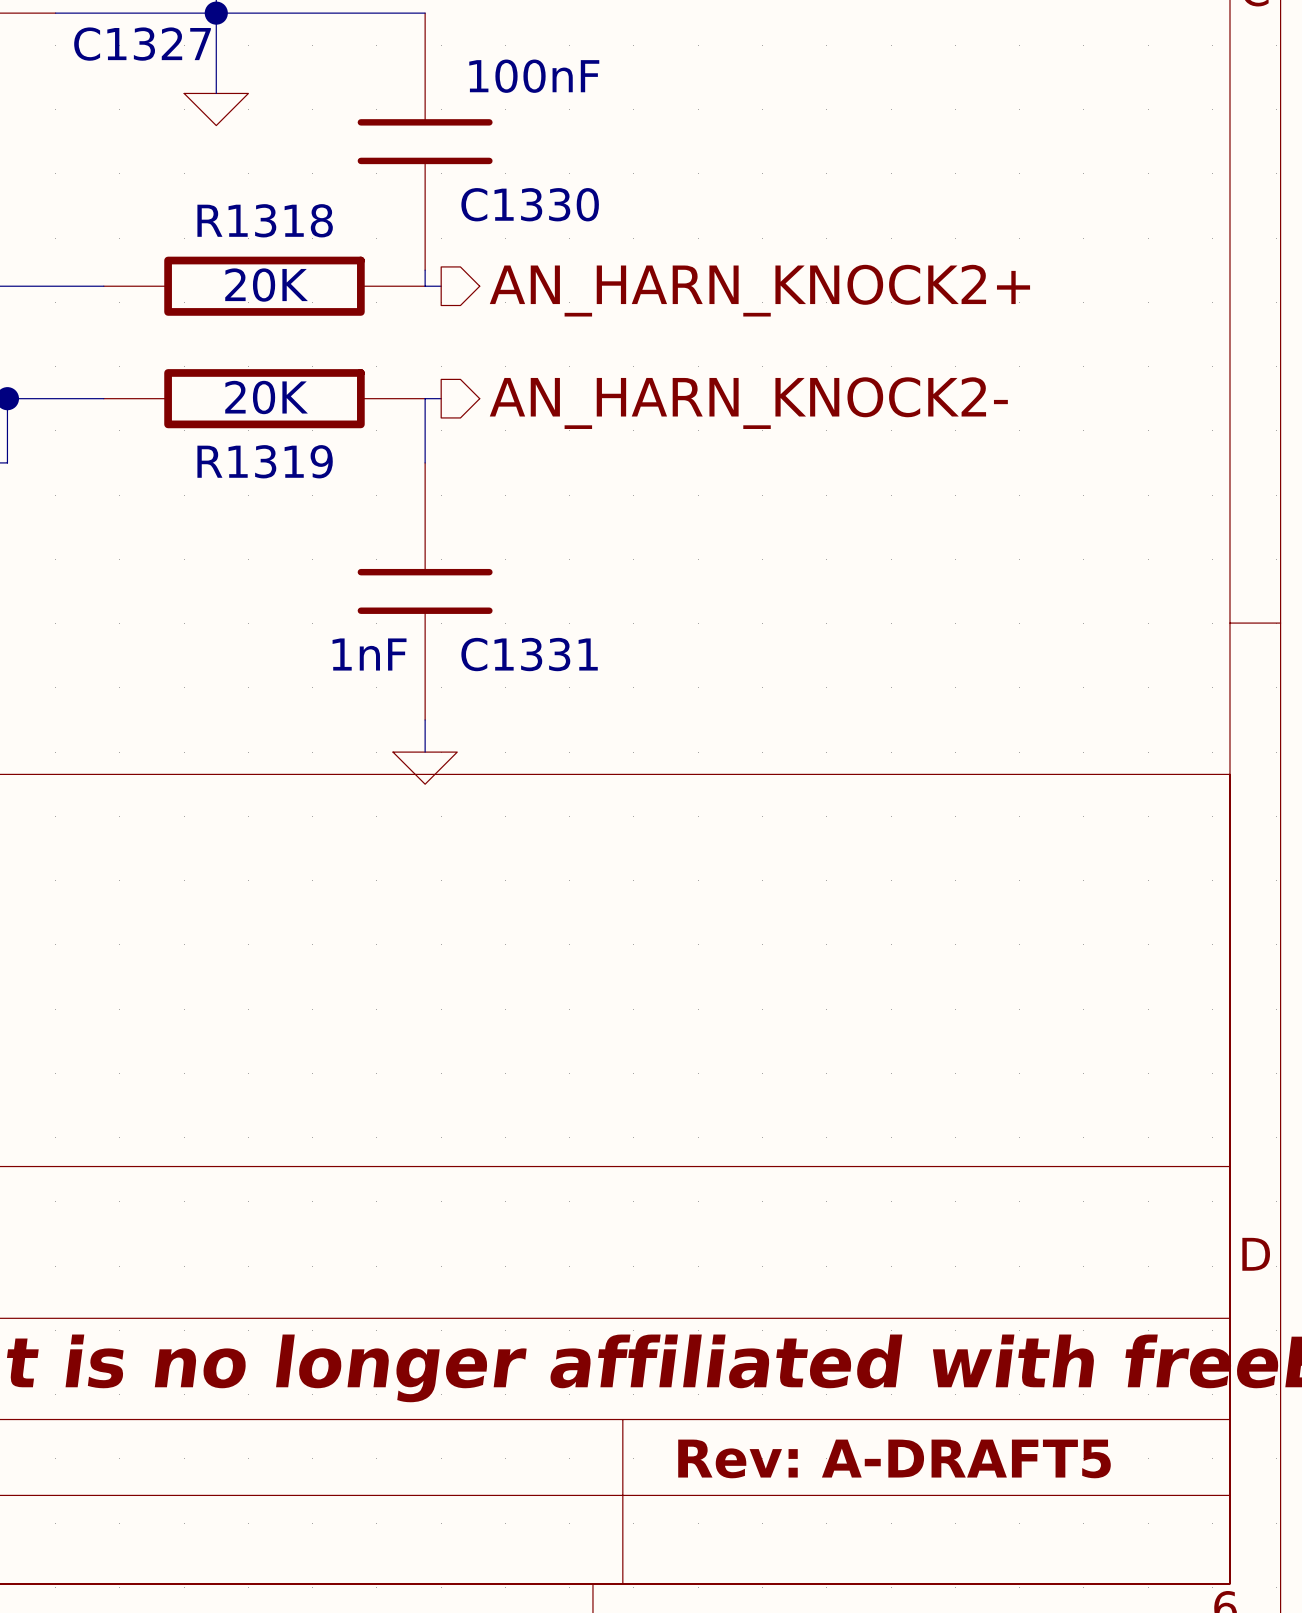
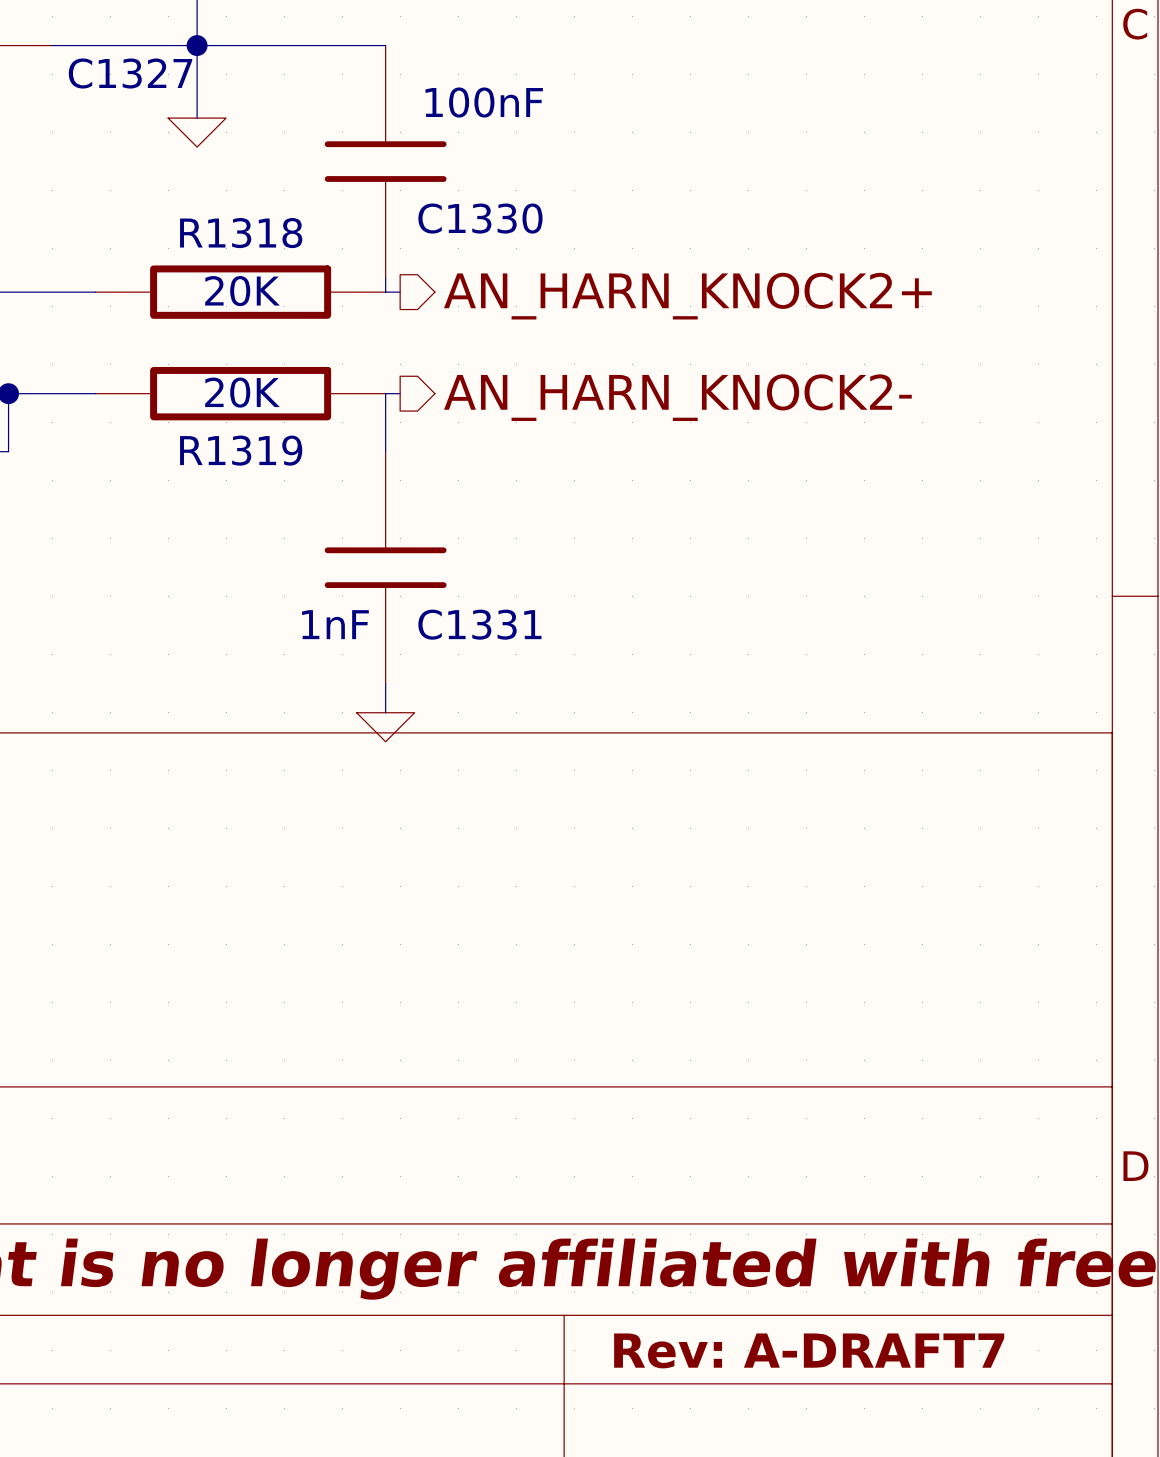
title block: Rev: A-DRAFT5 (894, 1458) -> Rev: A-DRAFT7 (809, 1350)

